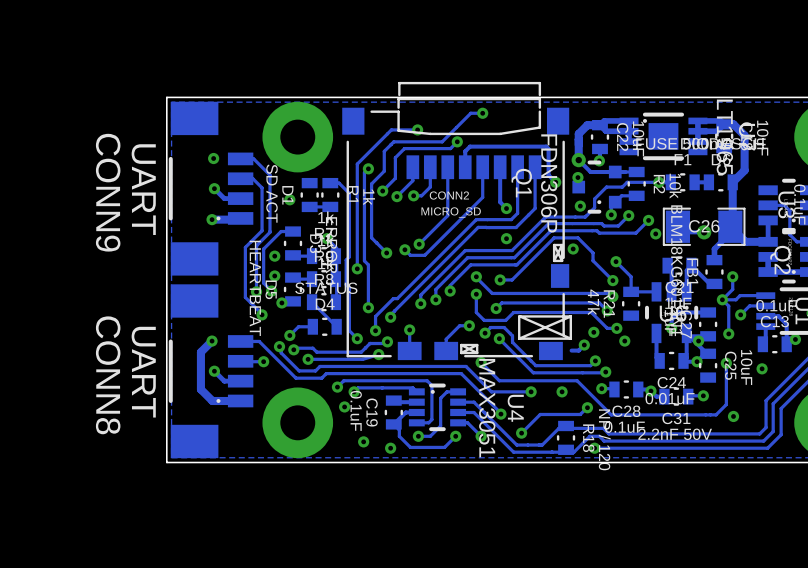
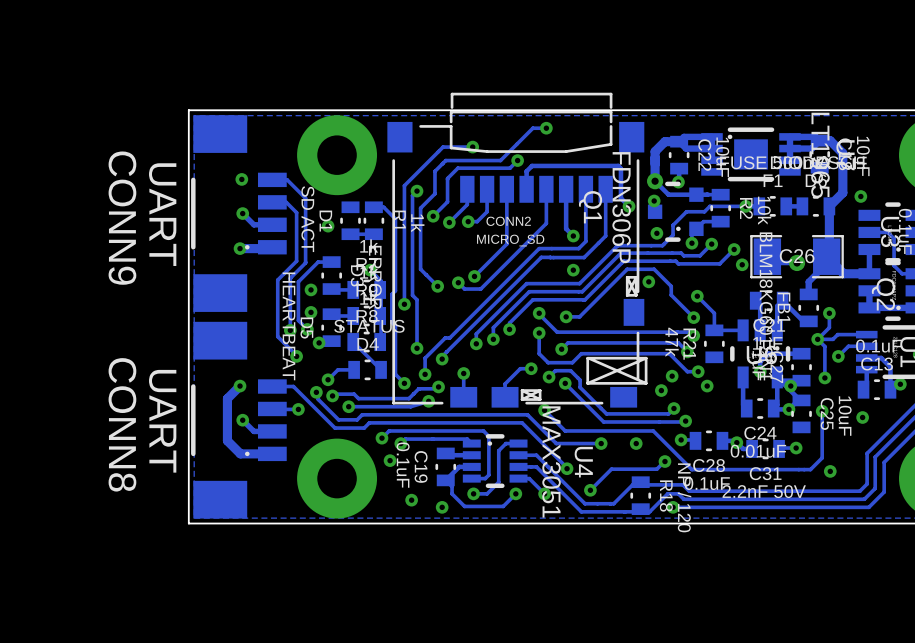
via: none -> (860, 196)
track: (584, 345) (578, 350) (571, 350) -> none

